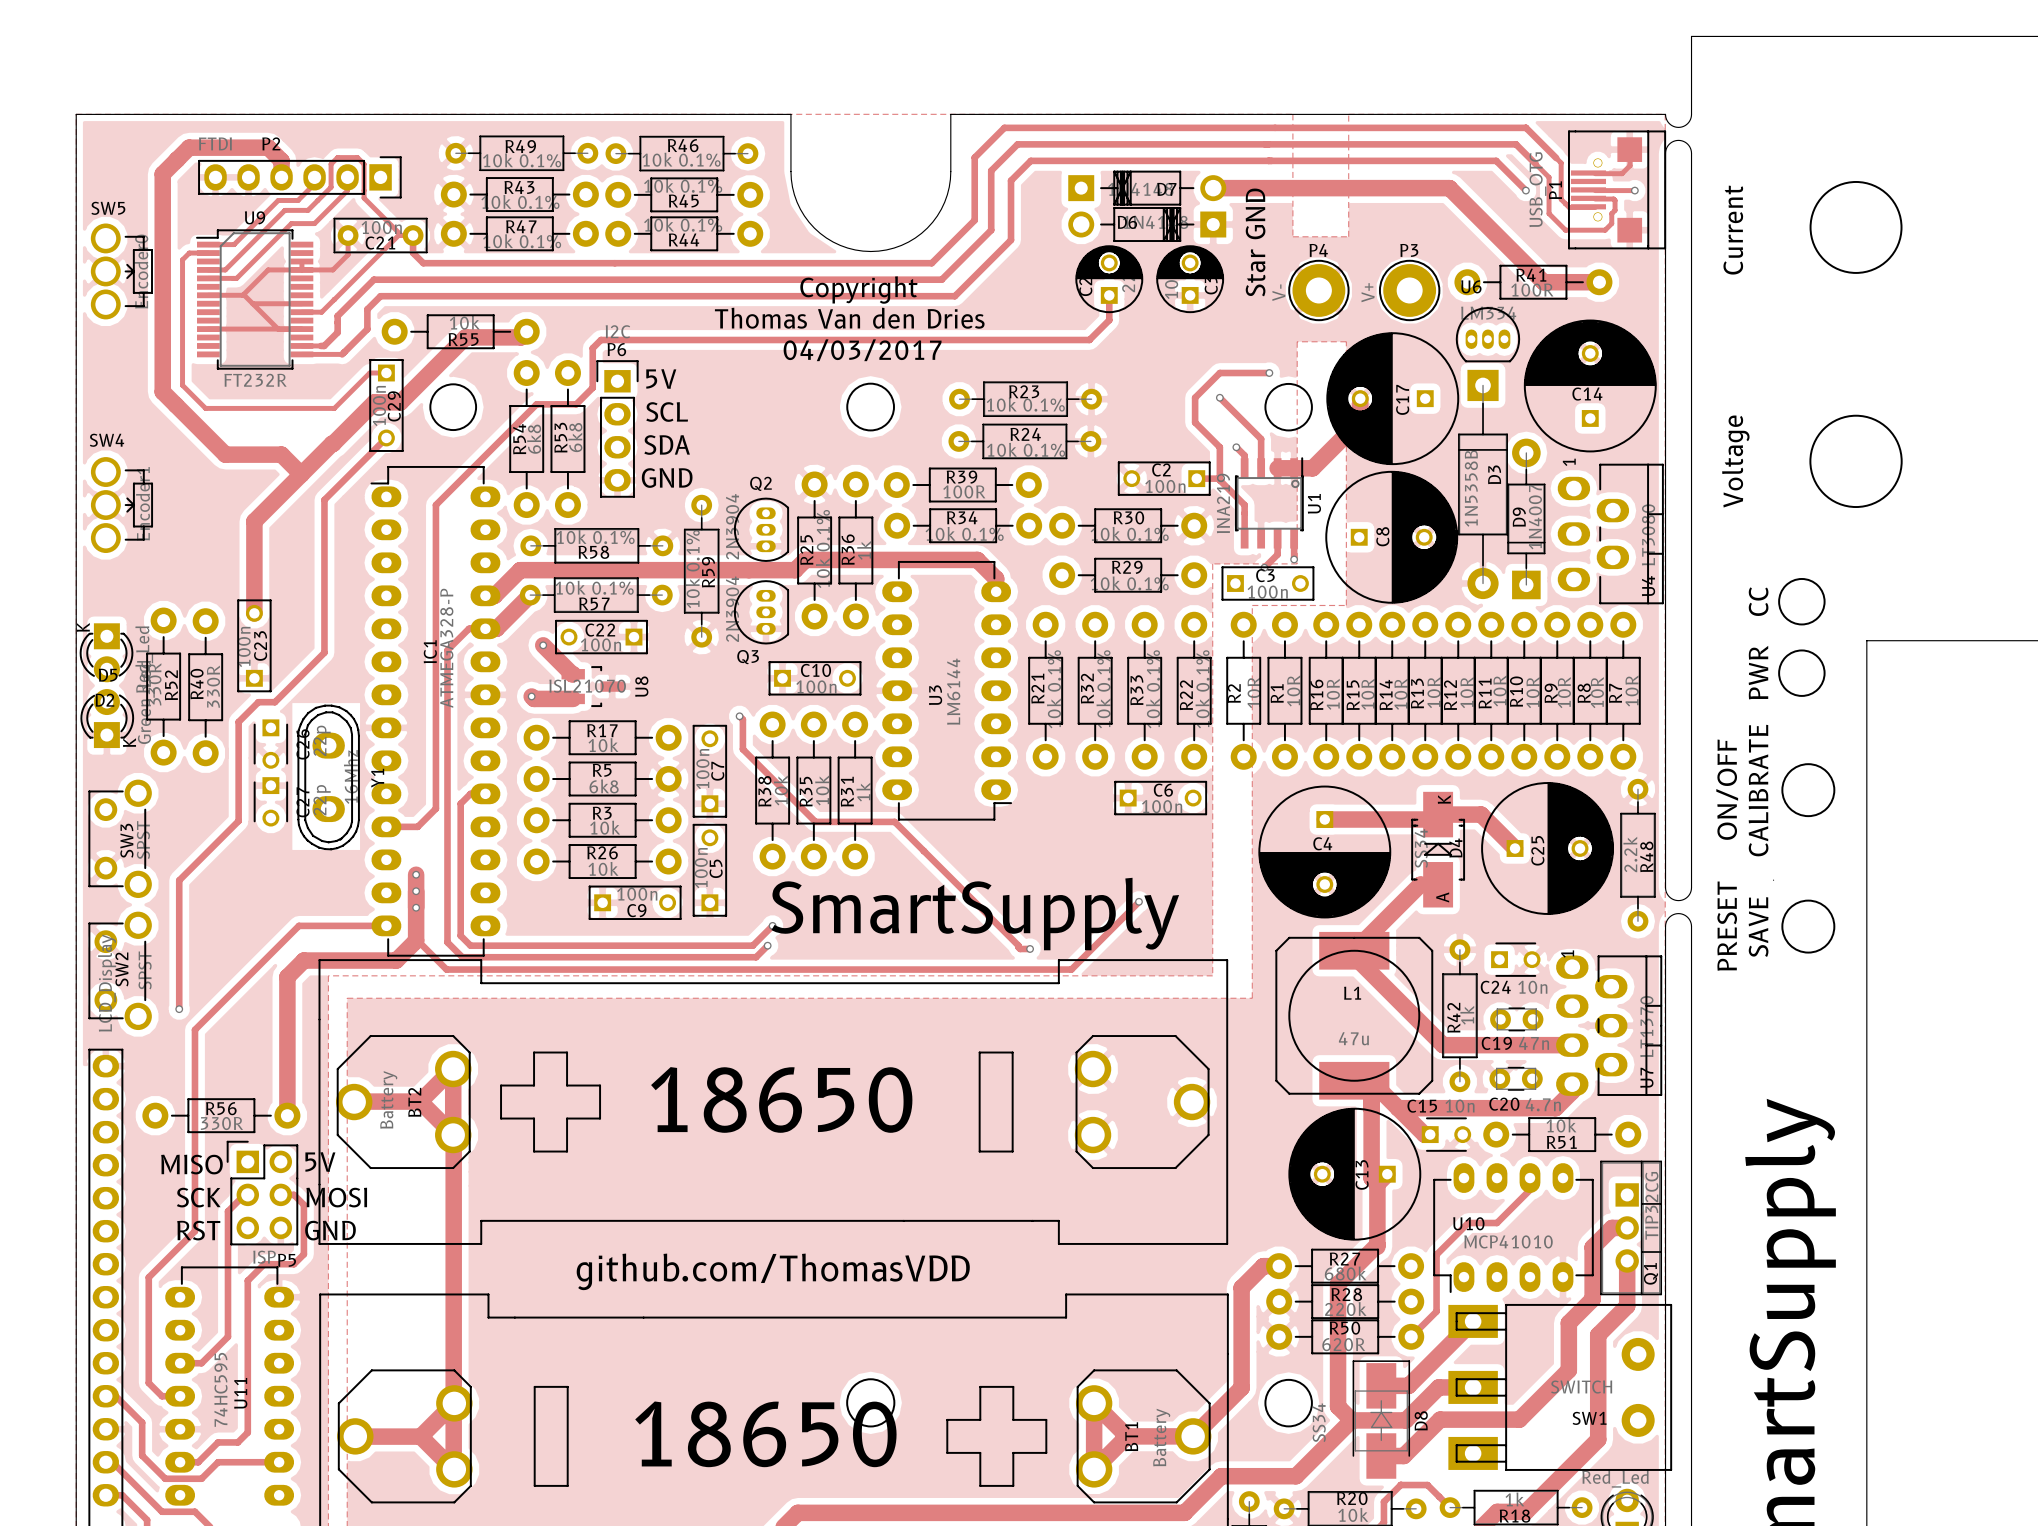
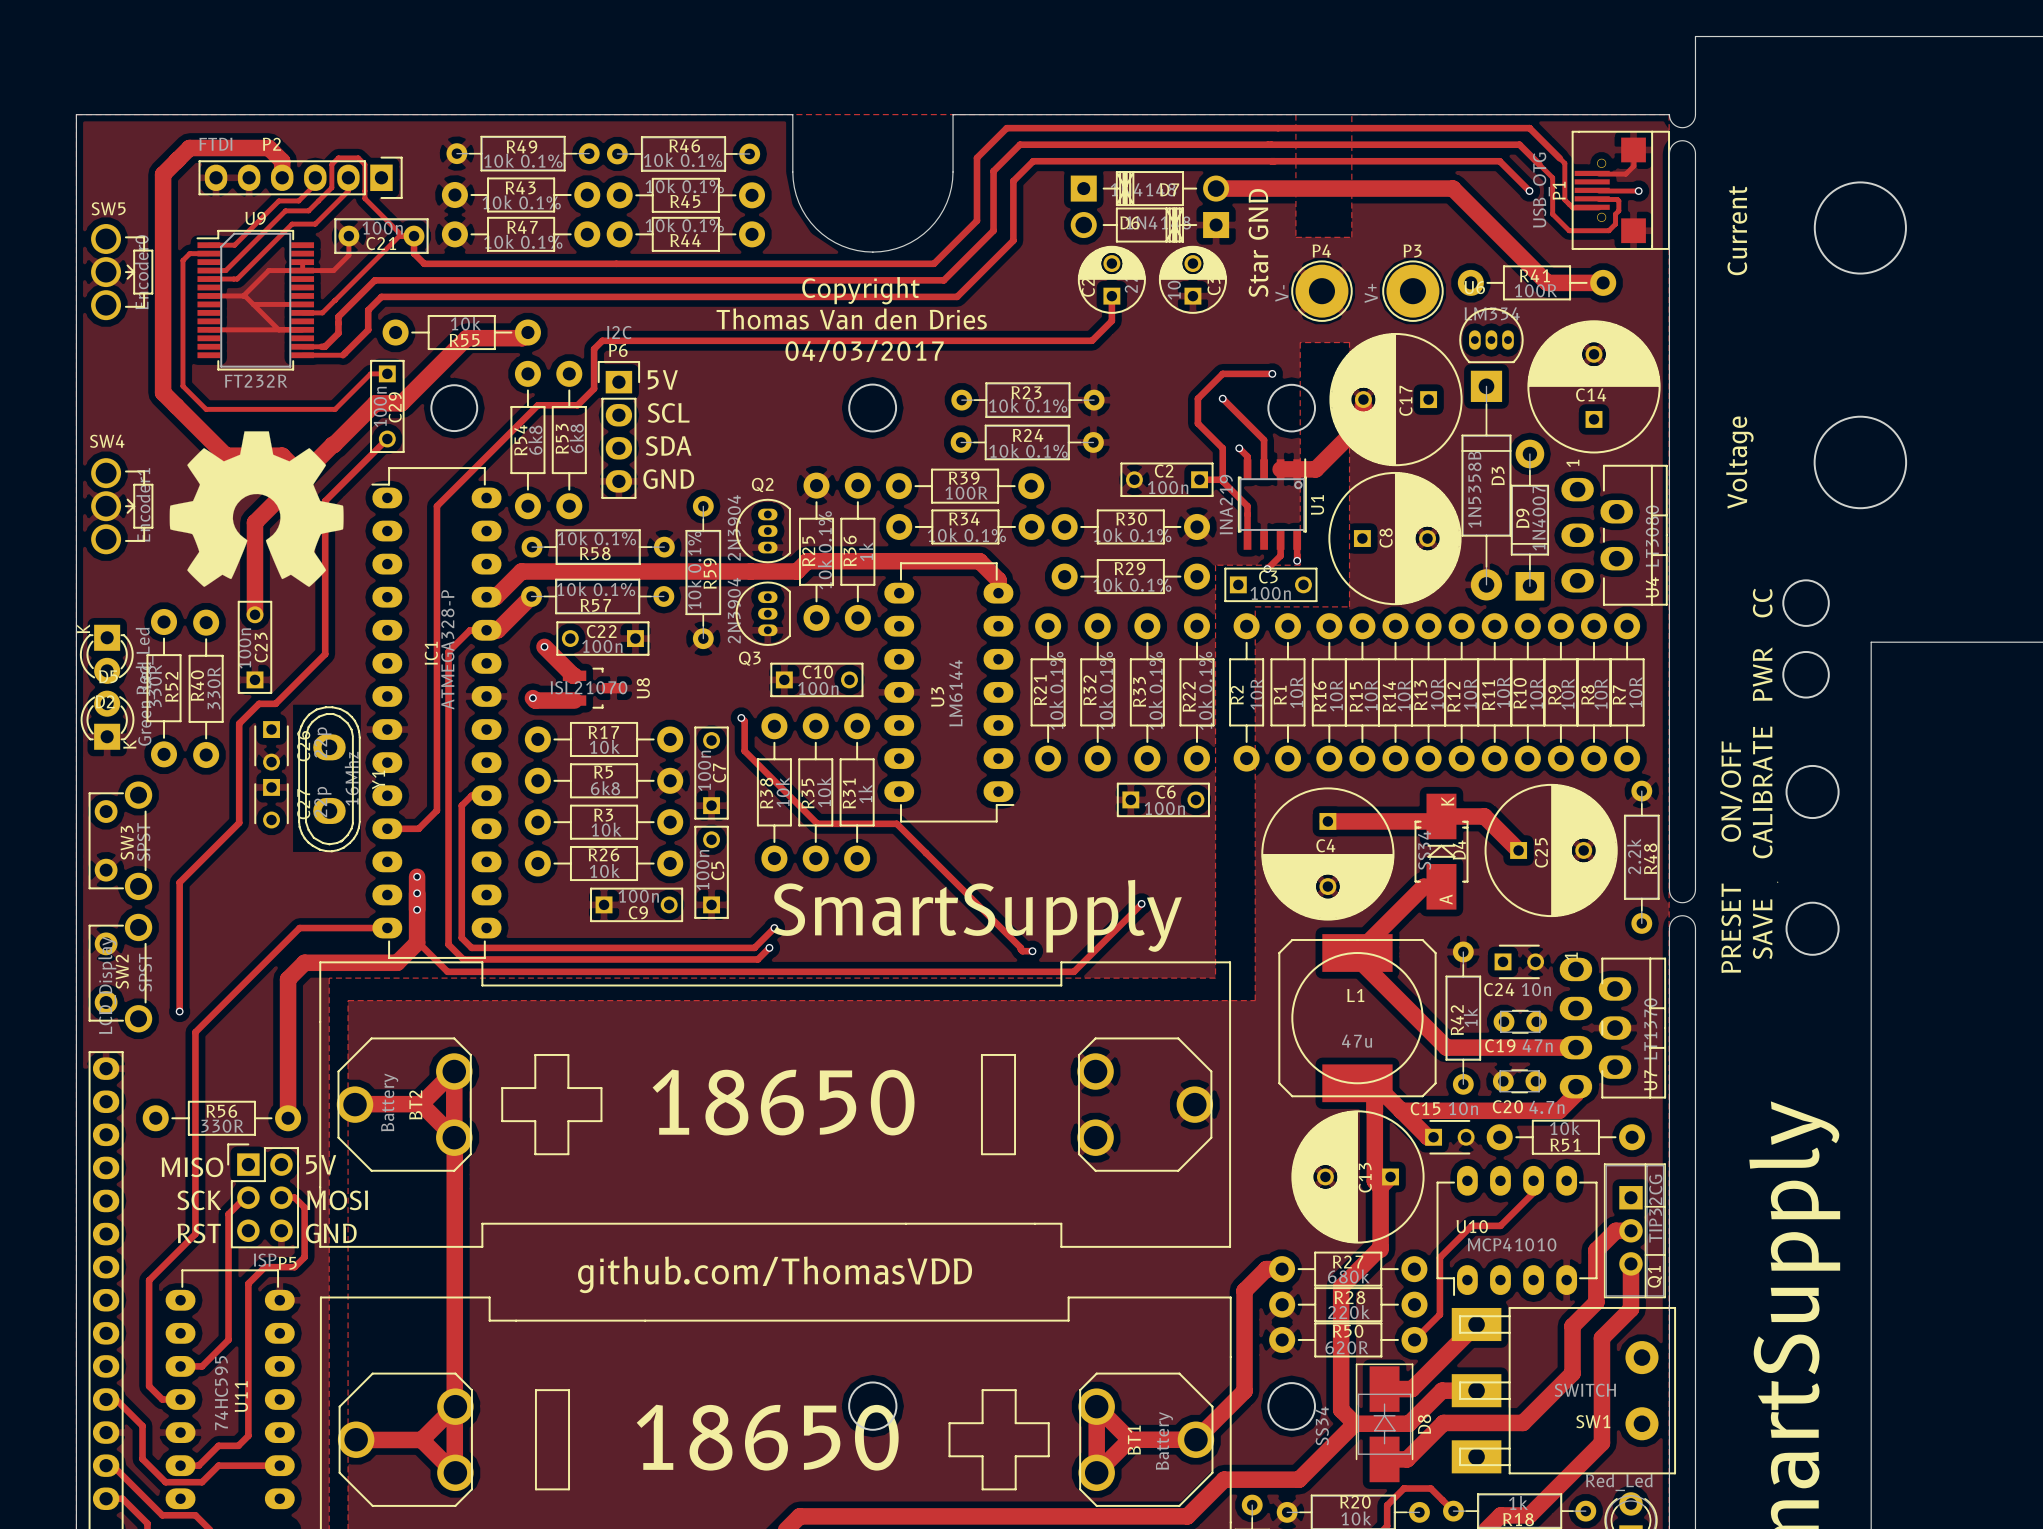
drawing: none -> [169, 431, 344, 587]

